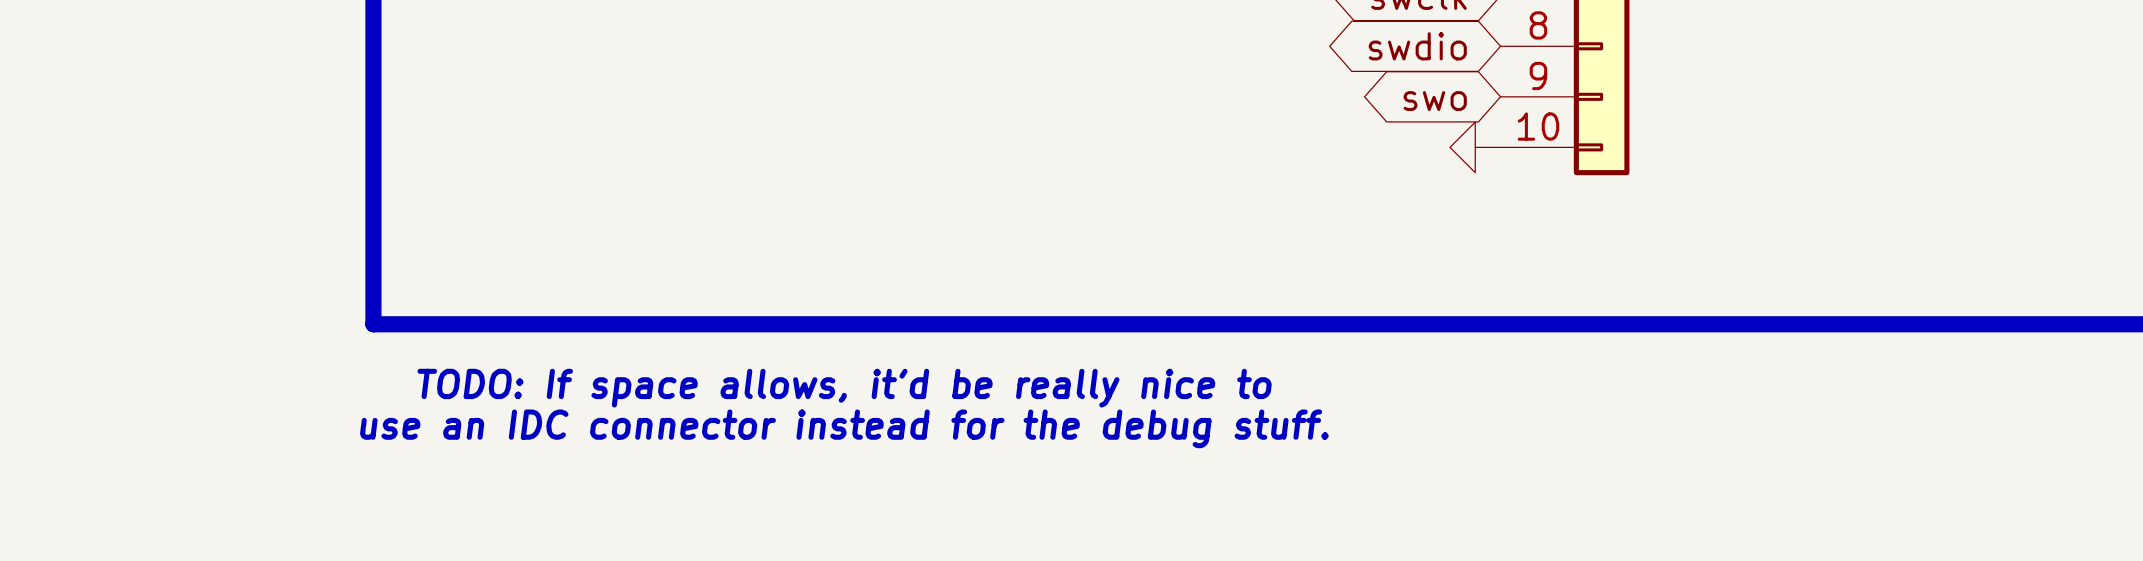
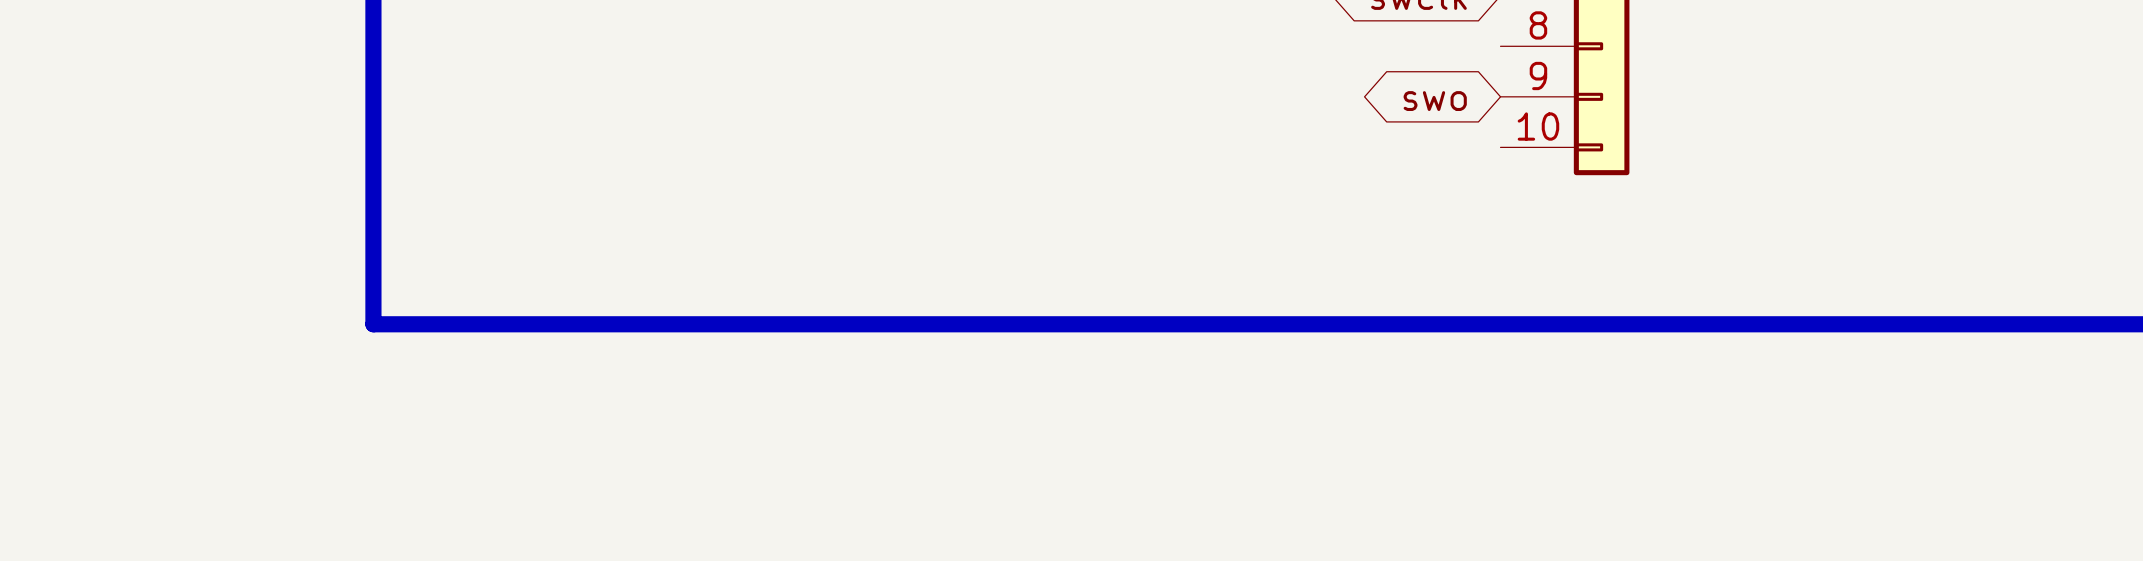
global label: swdio (1417, 46) -> none
power symbol: (1475, 147) -> none
text: TODO: If space allows, it'd be really nice to (844, 388) -> none
text: use an IDC connector instead for the debug stuff. (844, 428) -> none

